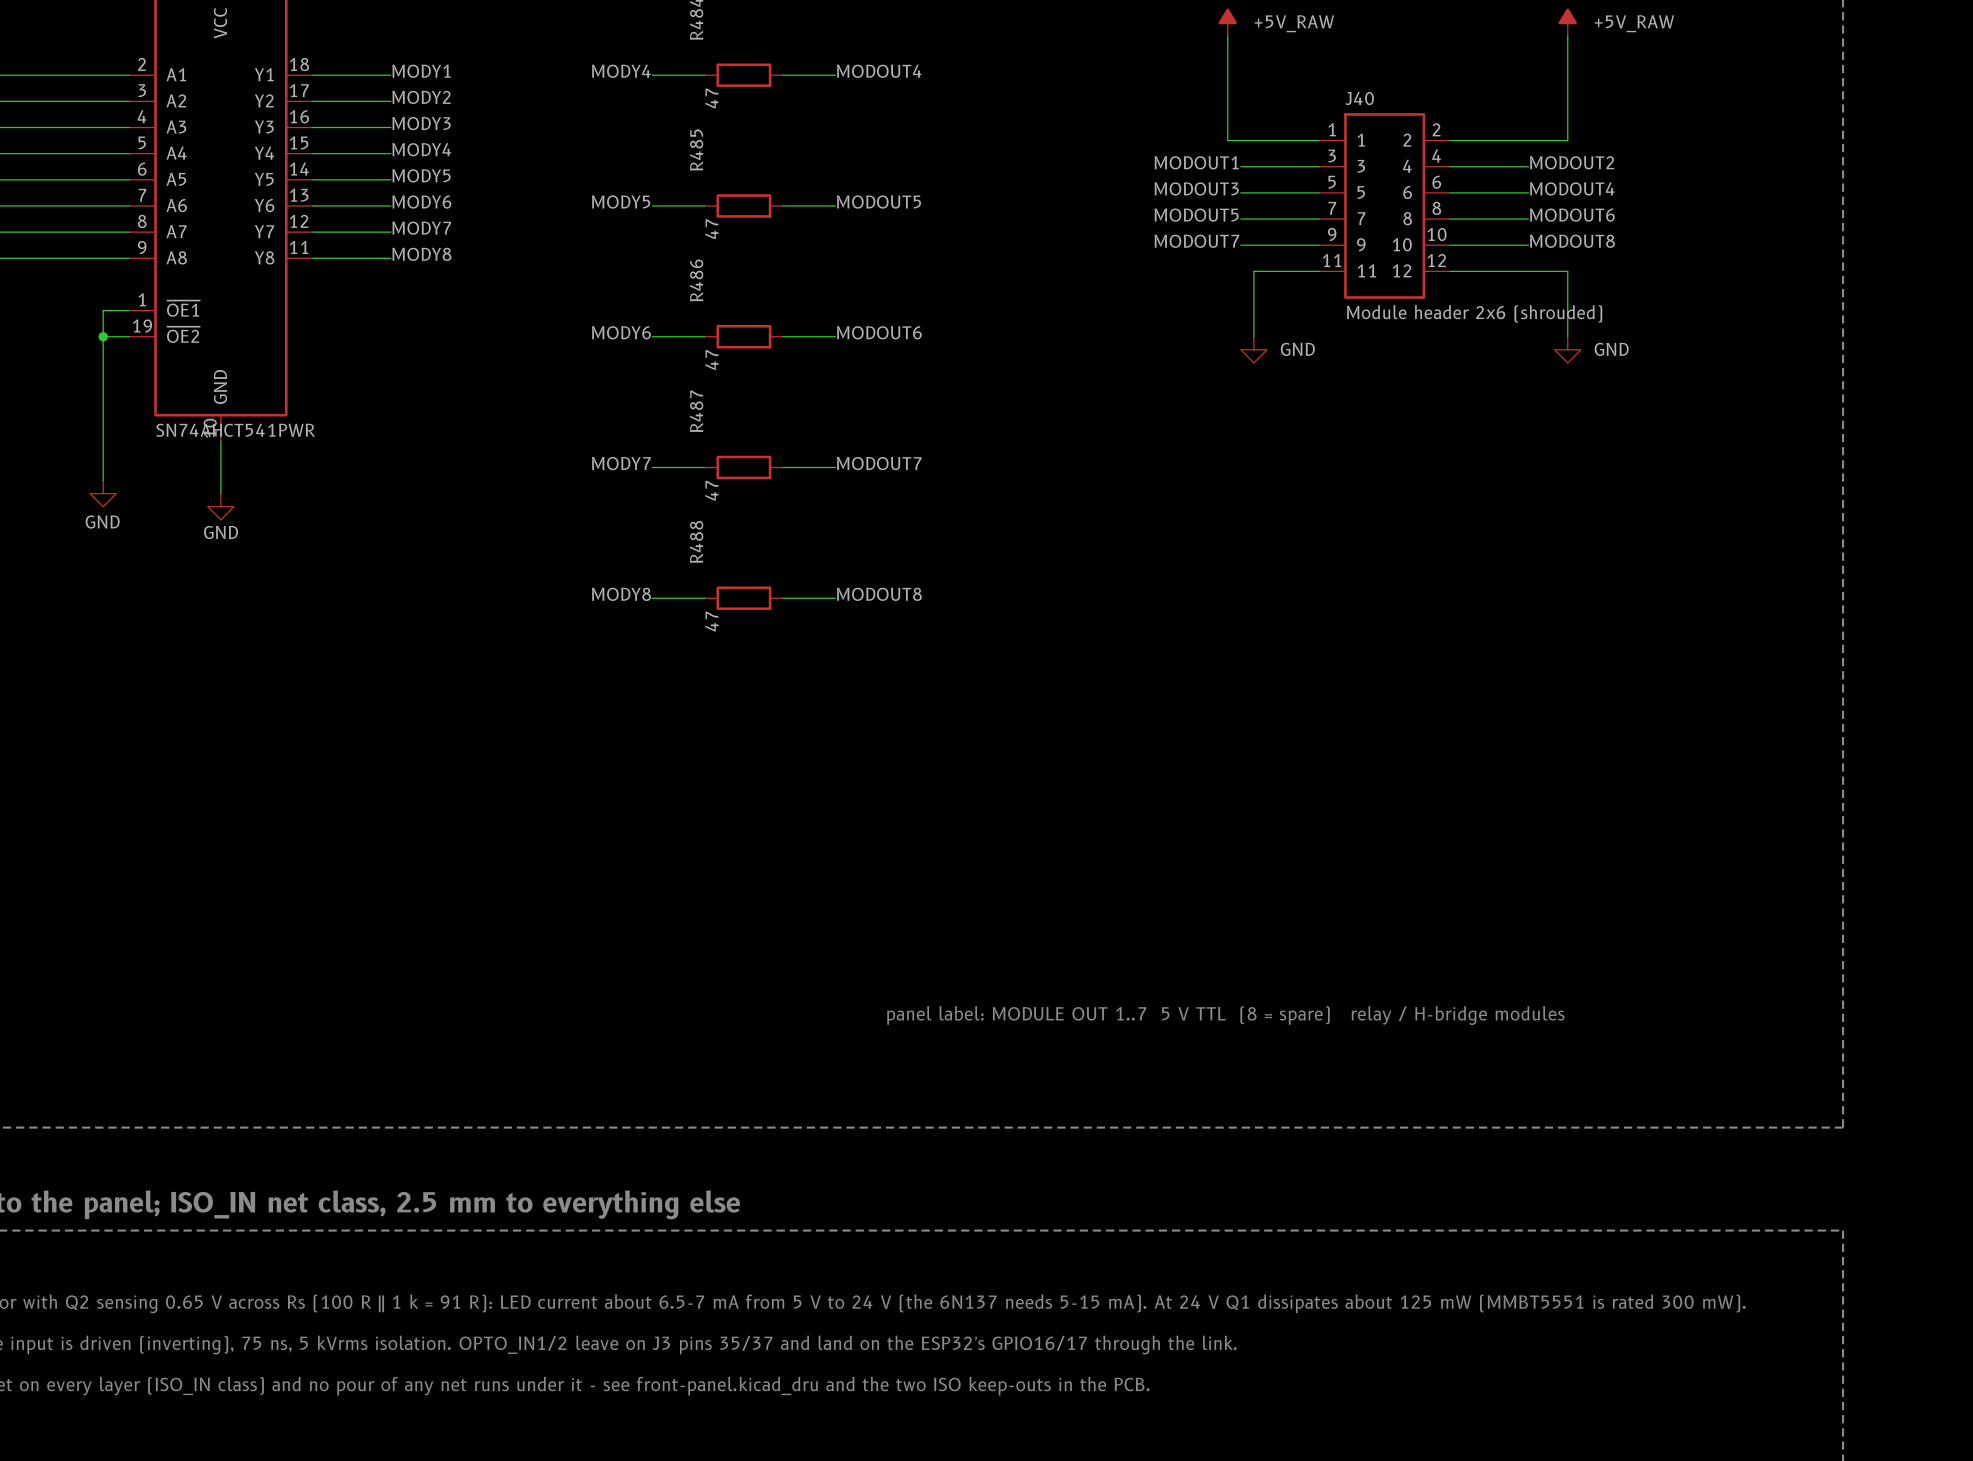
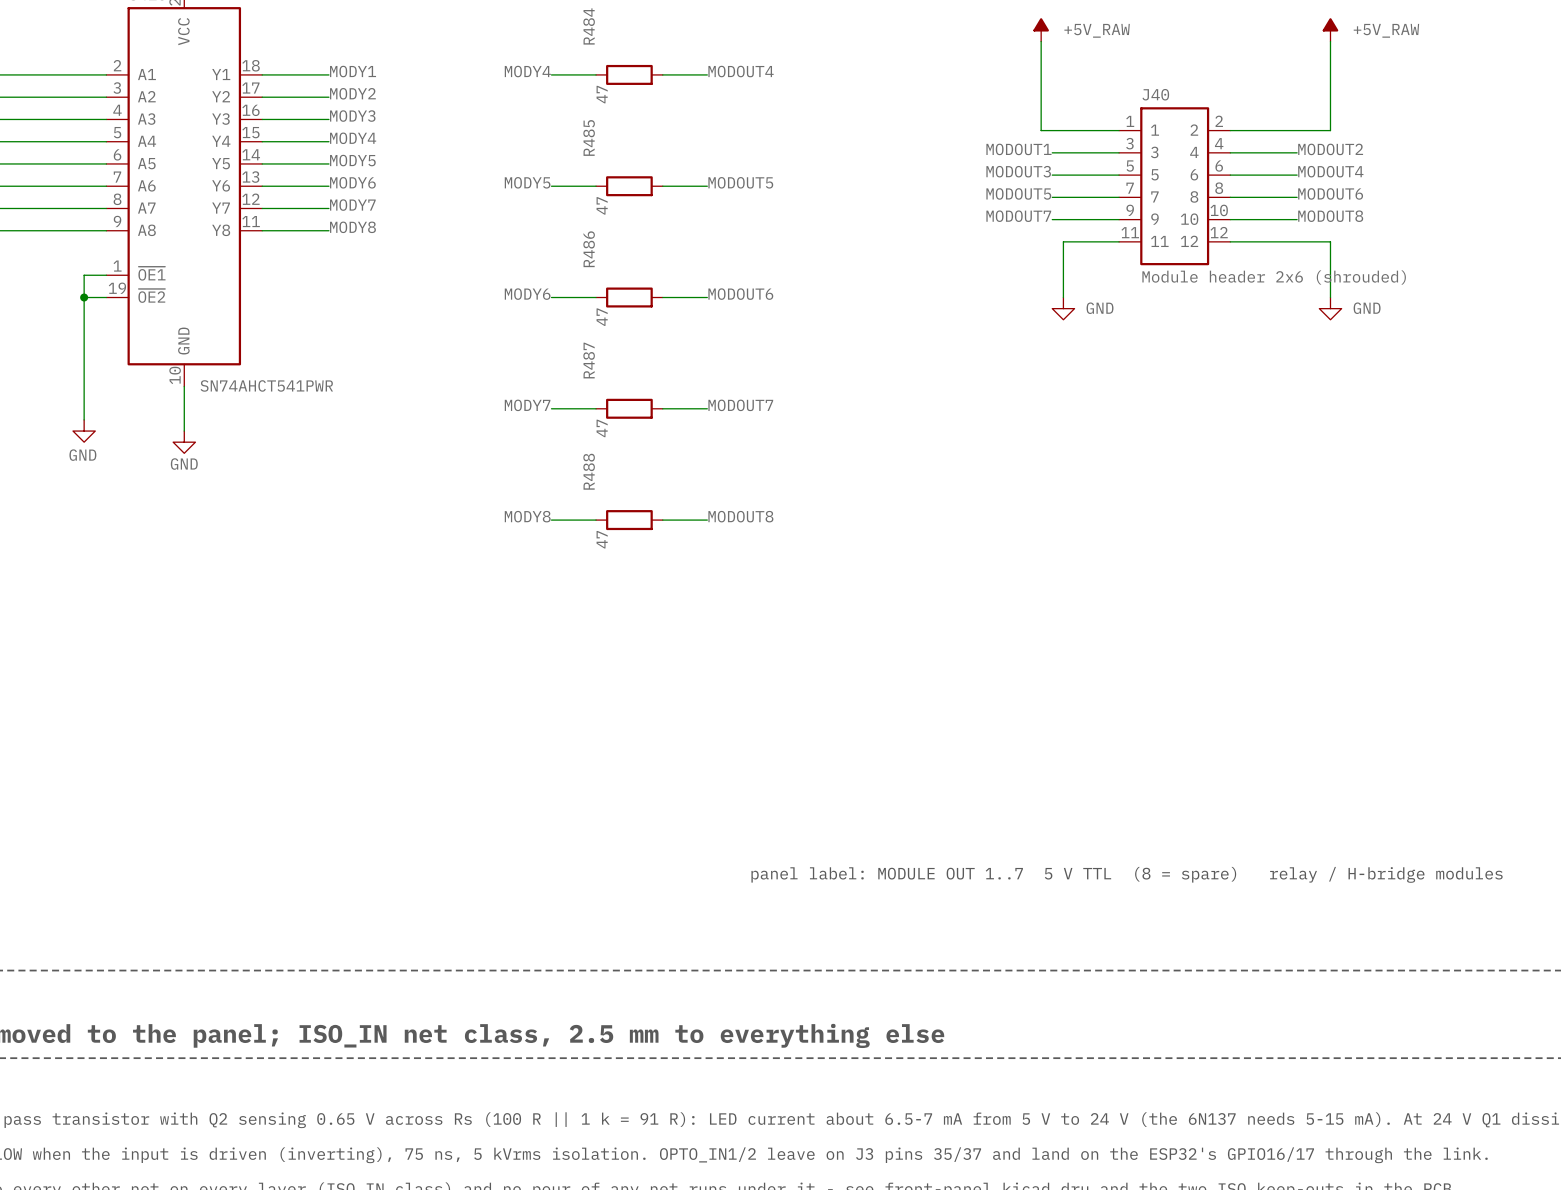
part value position: SN74AHCT541PWR (235, 430) -> SN74AHCT541PWR (266, 385)

